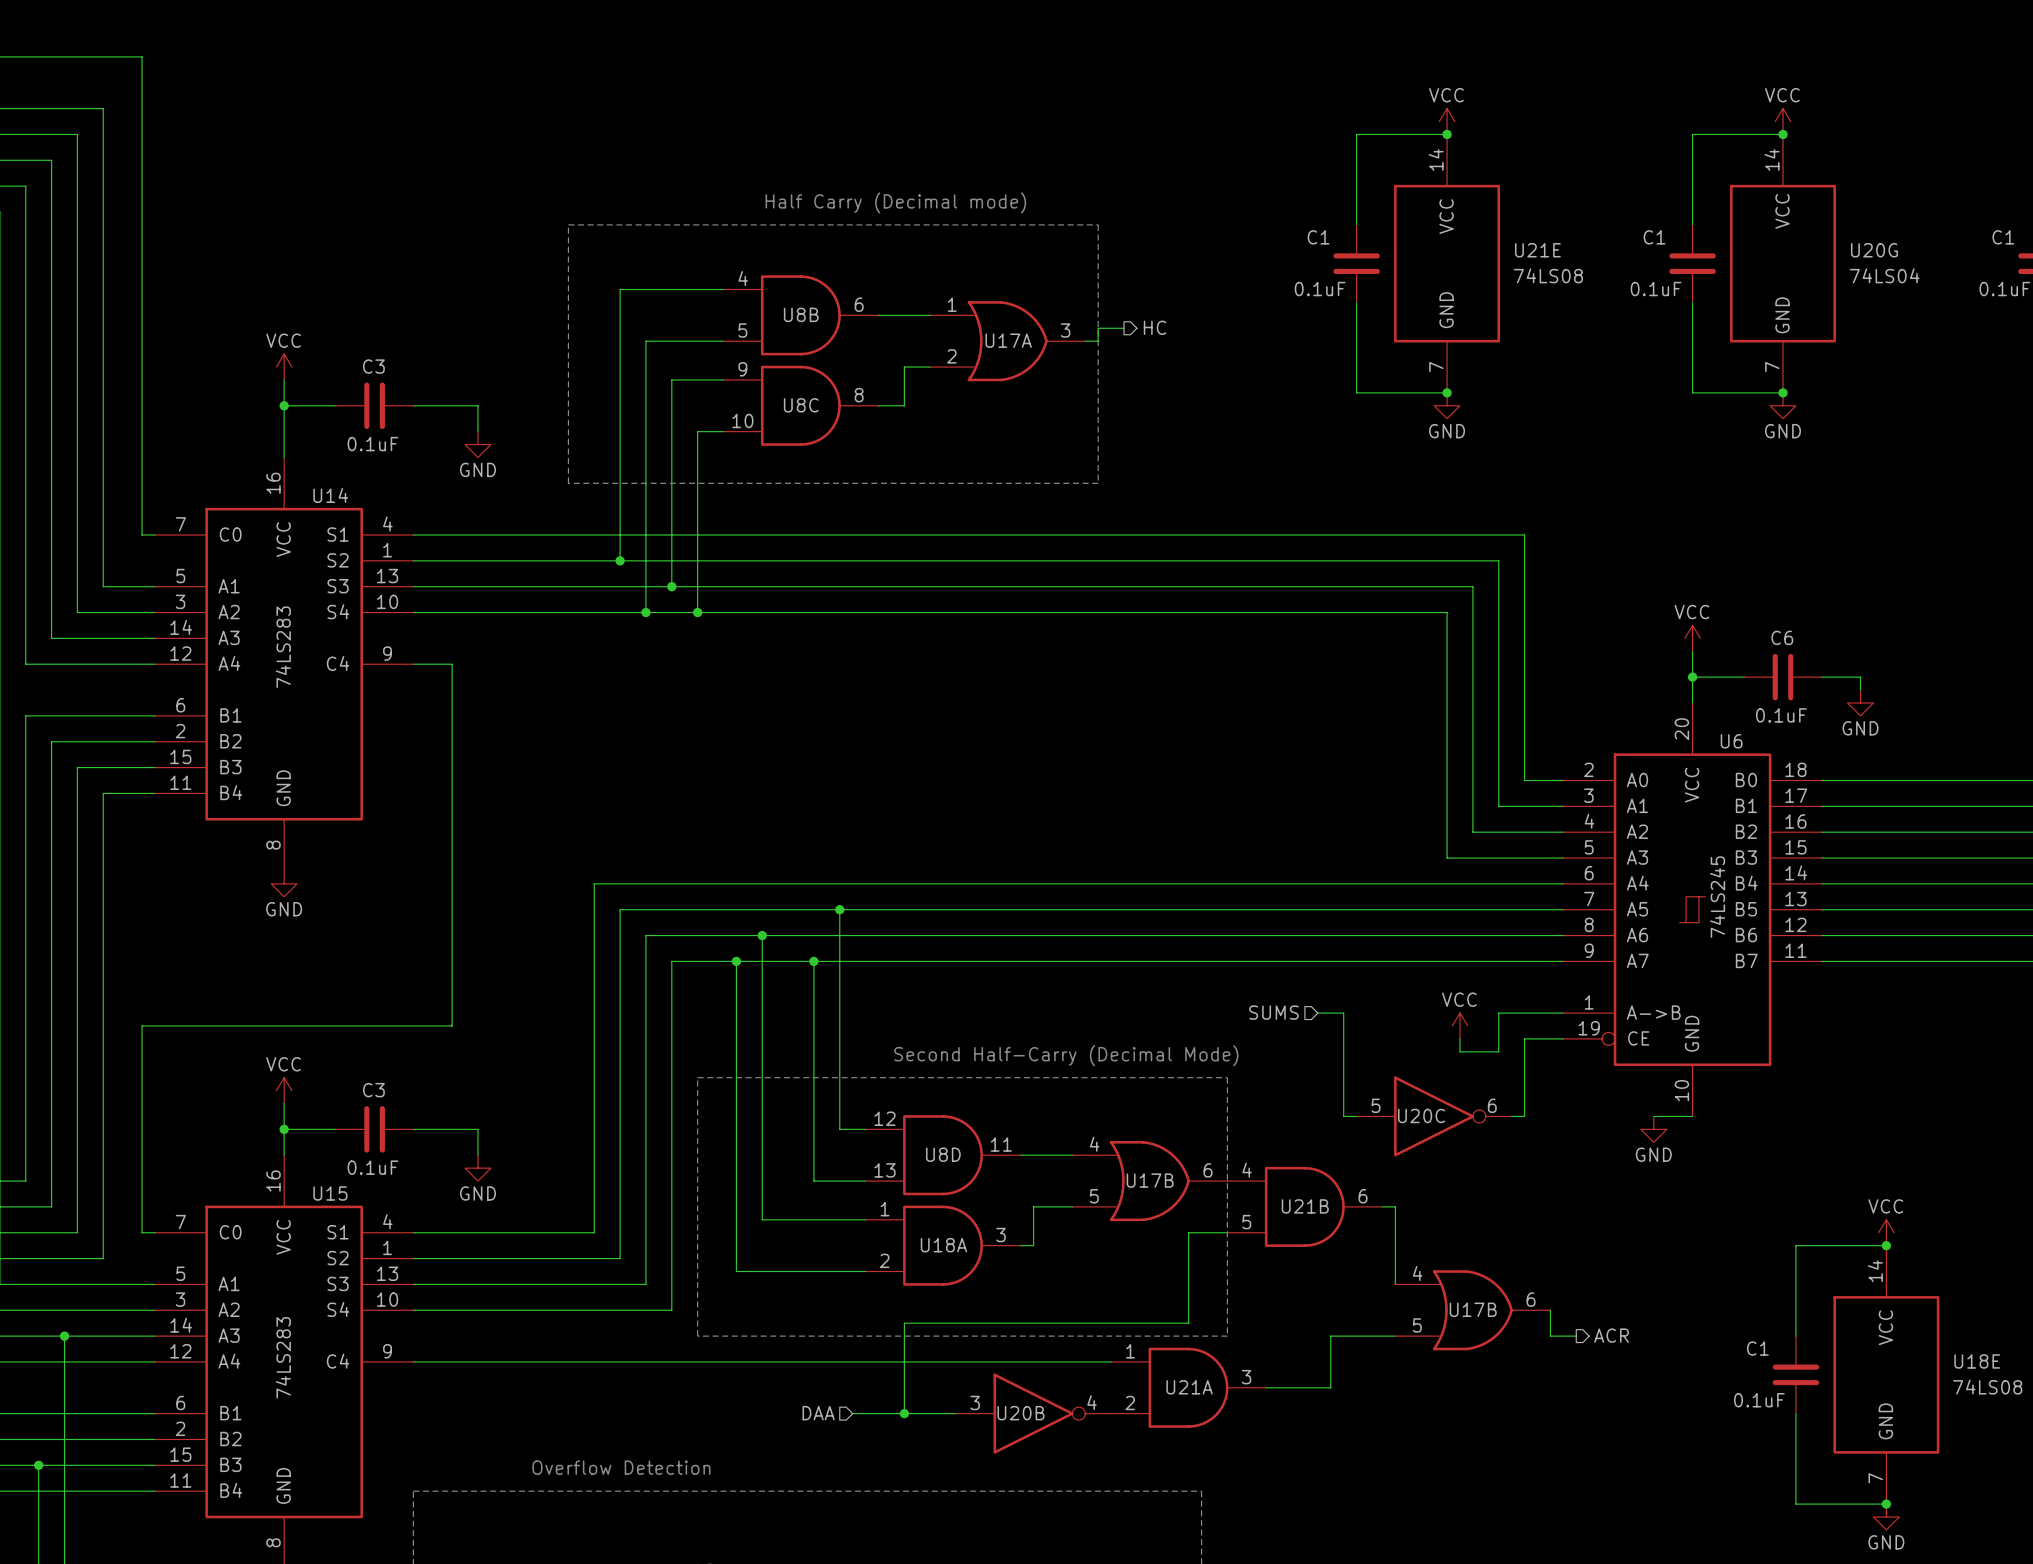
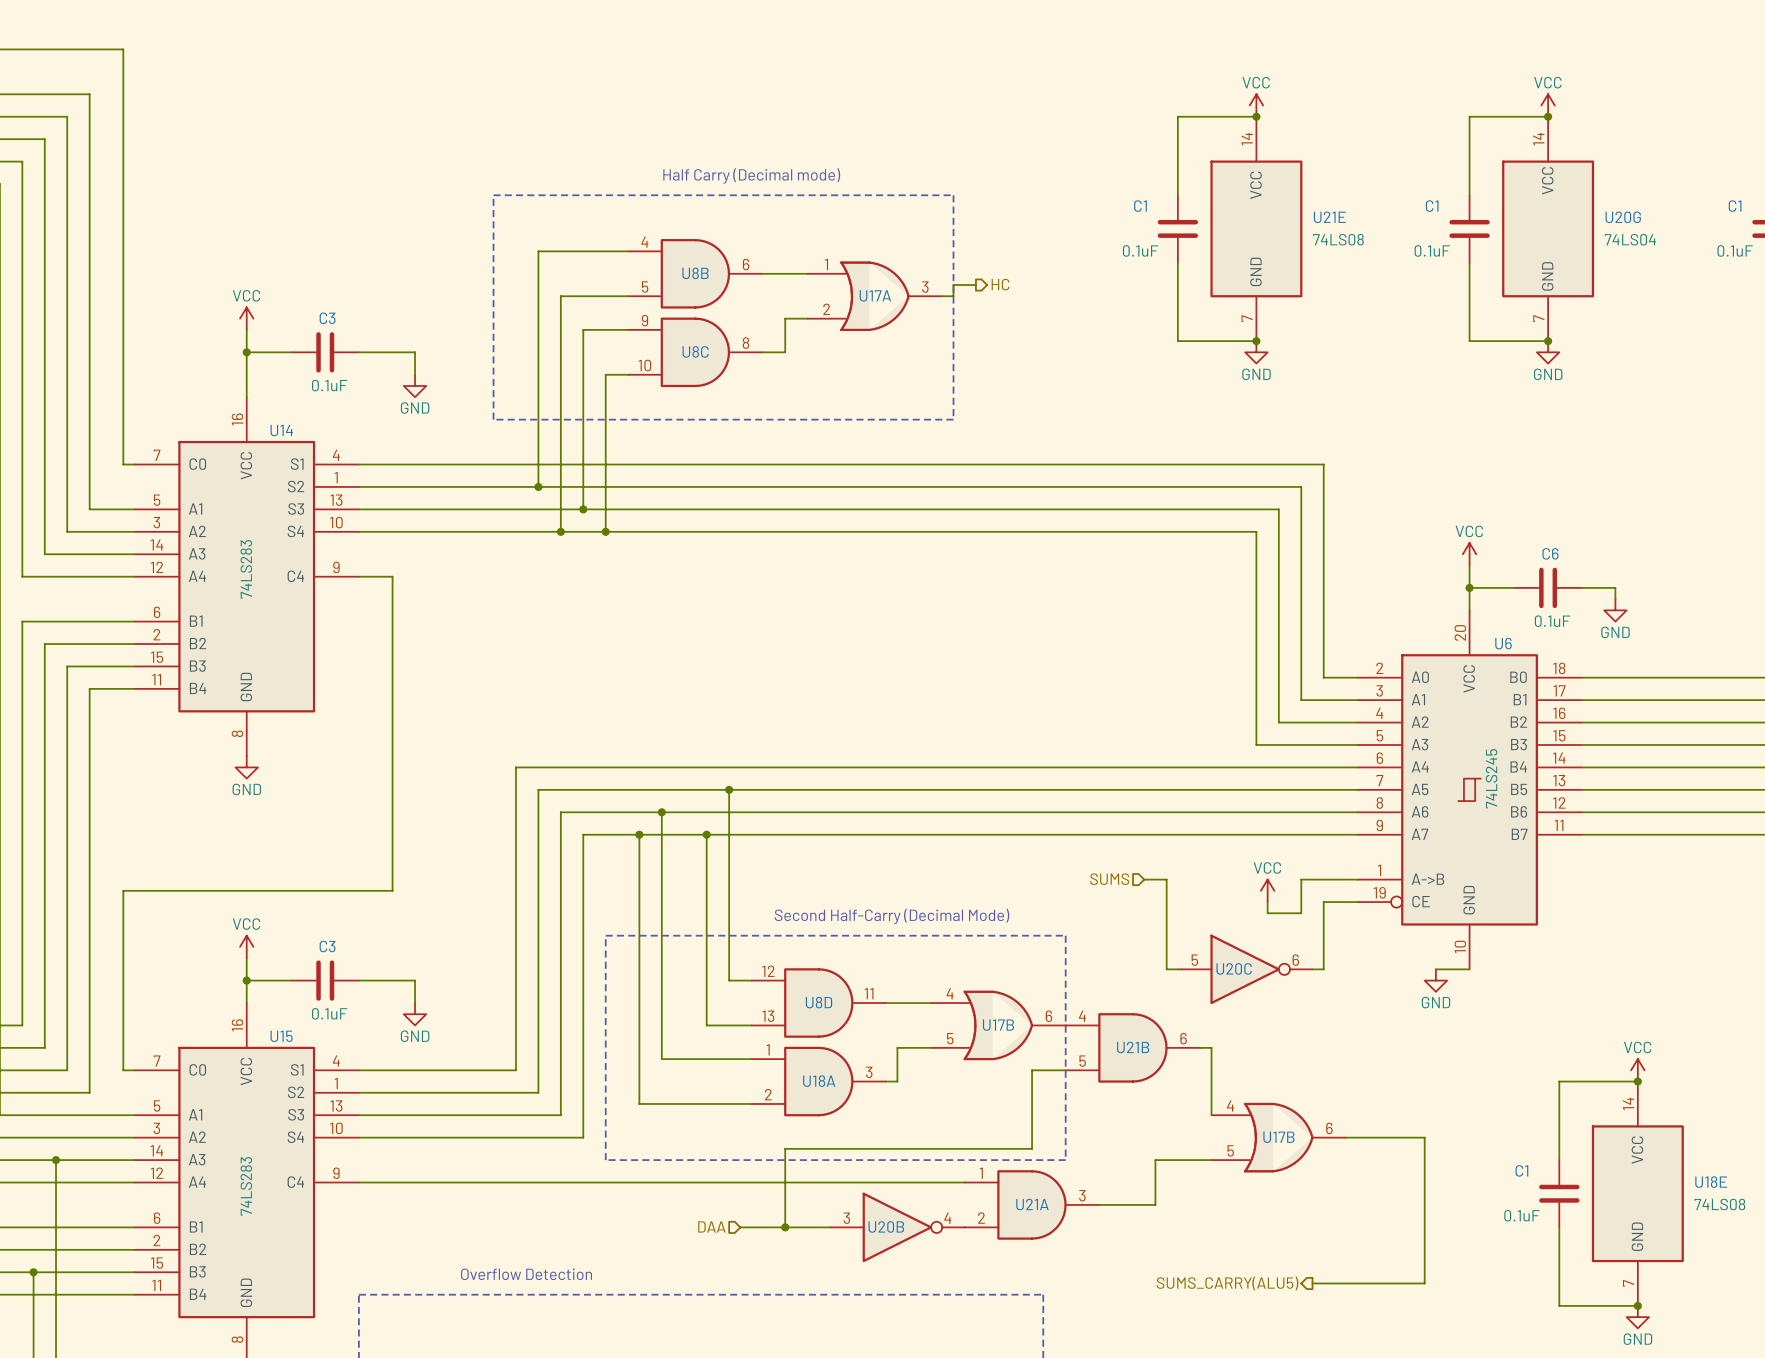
wire: (1550, 1310) (1550, 1336) (1576, 1336) -> (1346, 1137) (1424, 1137) (1424, 1283) (1312, 1283)
hierarchical label: ACR (1611, 1335) -> none
hierarchical label: none -> SUMS_CARRY(ALU5) (1227, 1283)

